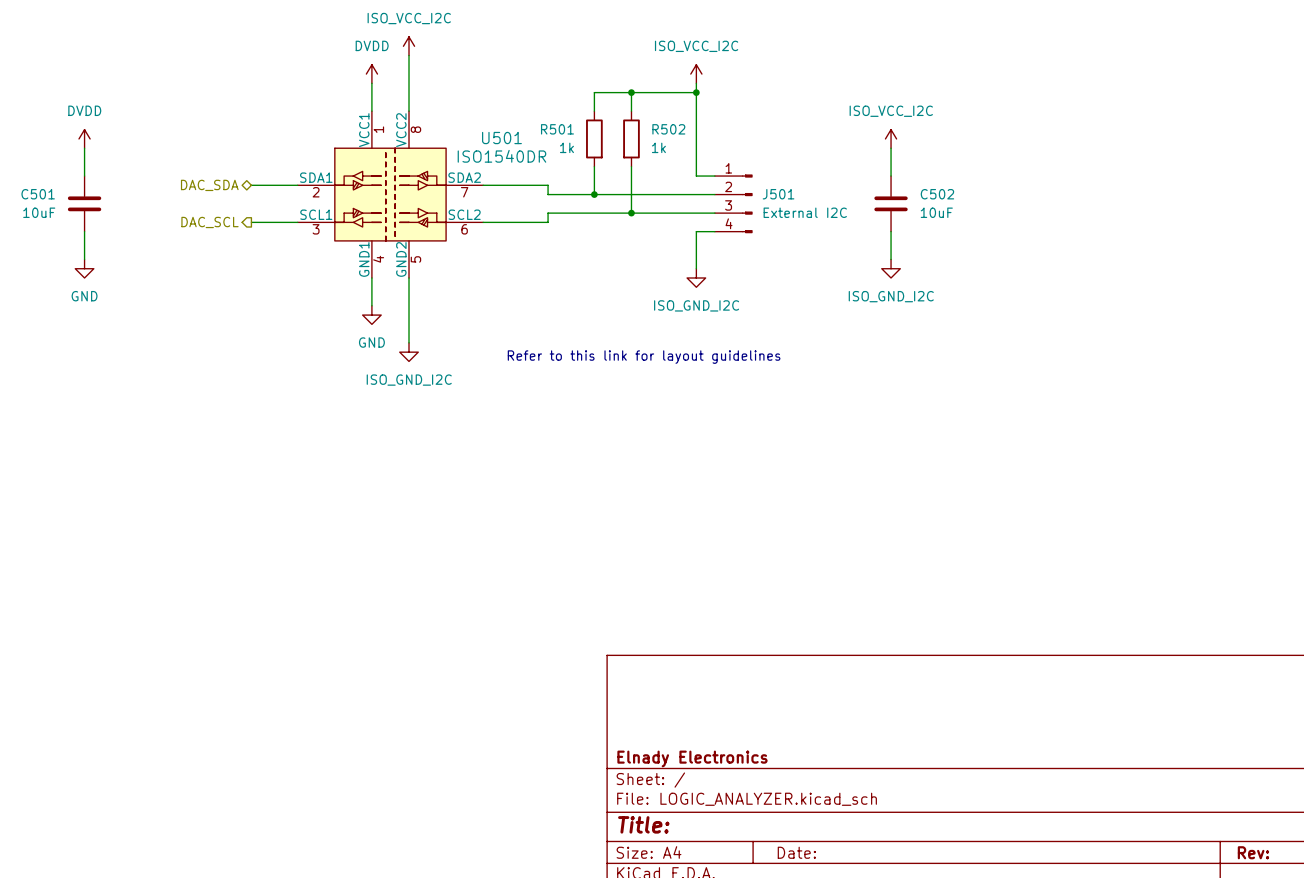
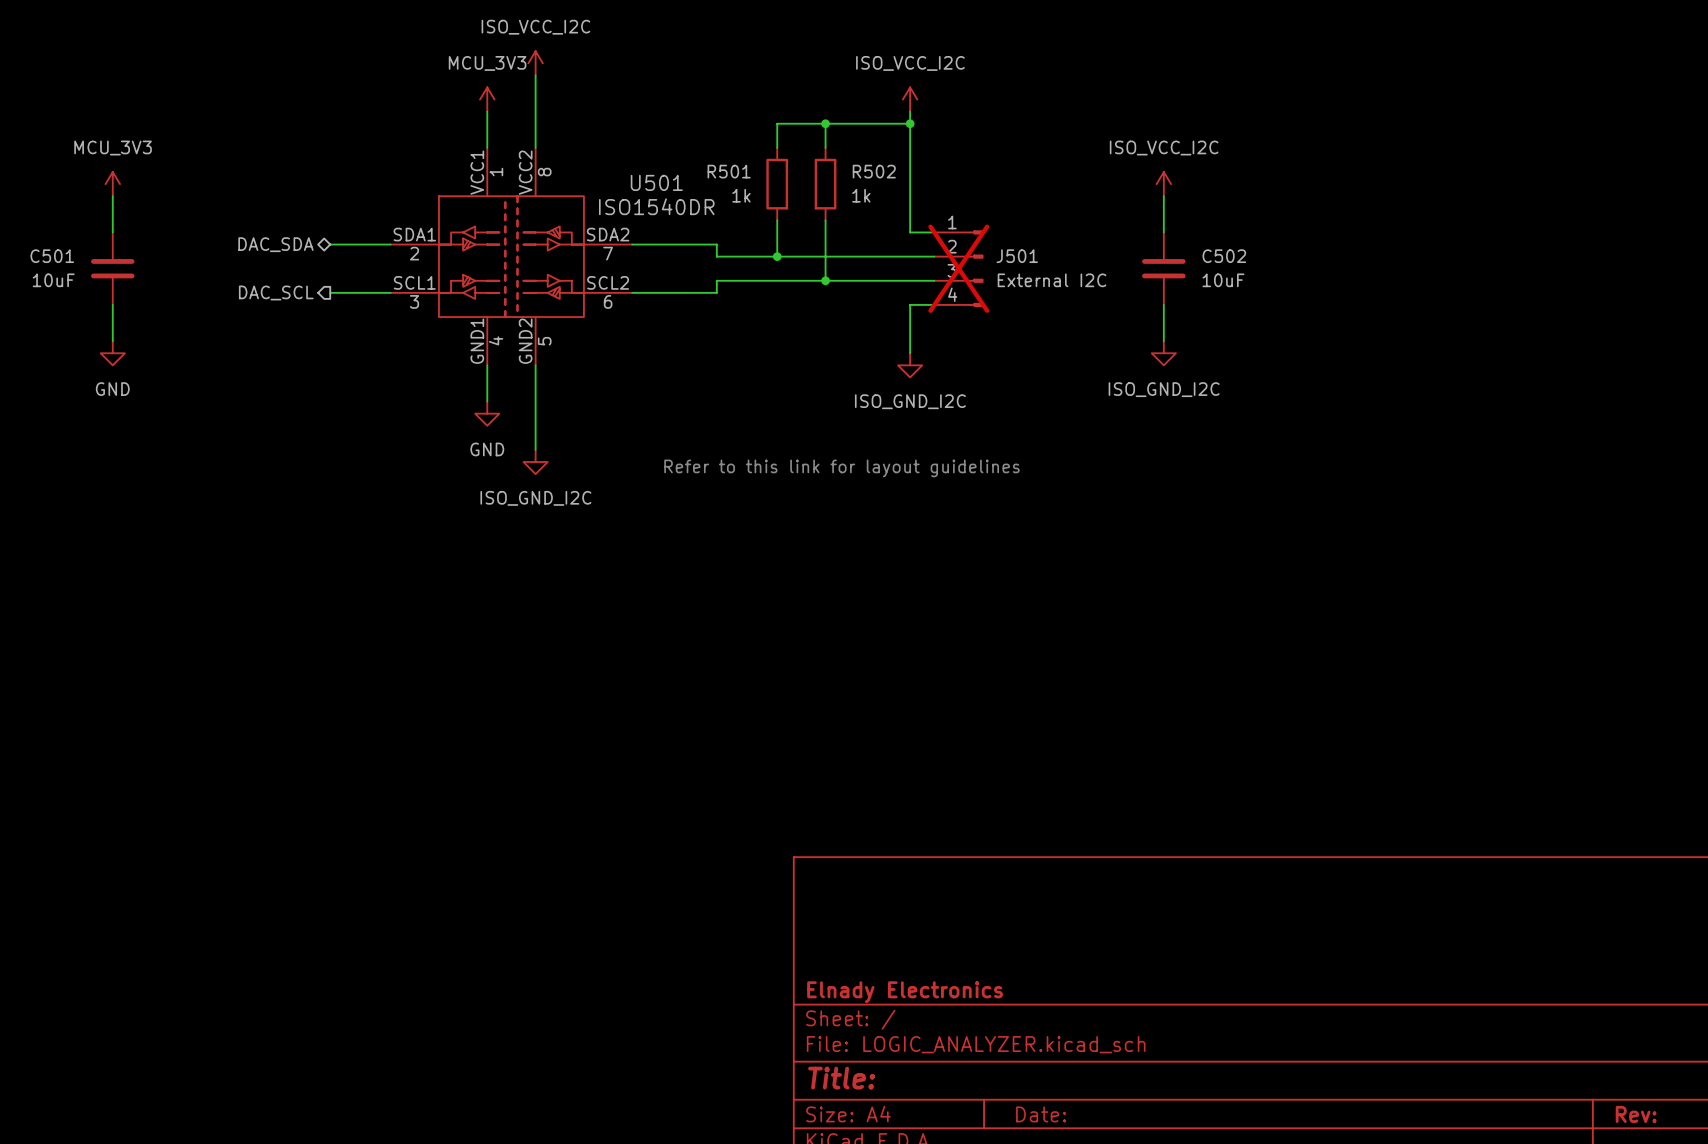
power symbol: DVDD (371, 74) -> MCU_3V3 (487, 99)
power symbol: DVDD (84, 138) -> MCU_3V3 (112, 184)
J501 do-not-place cross: none -> (958, 268)

